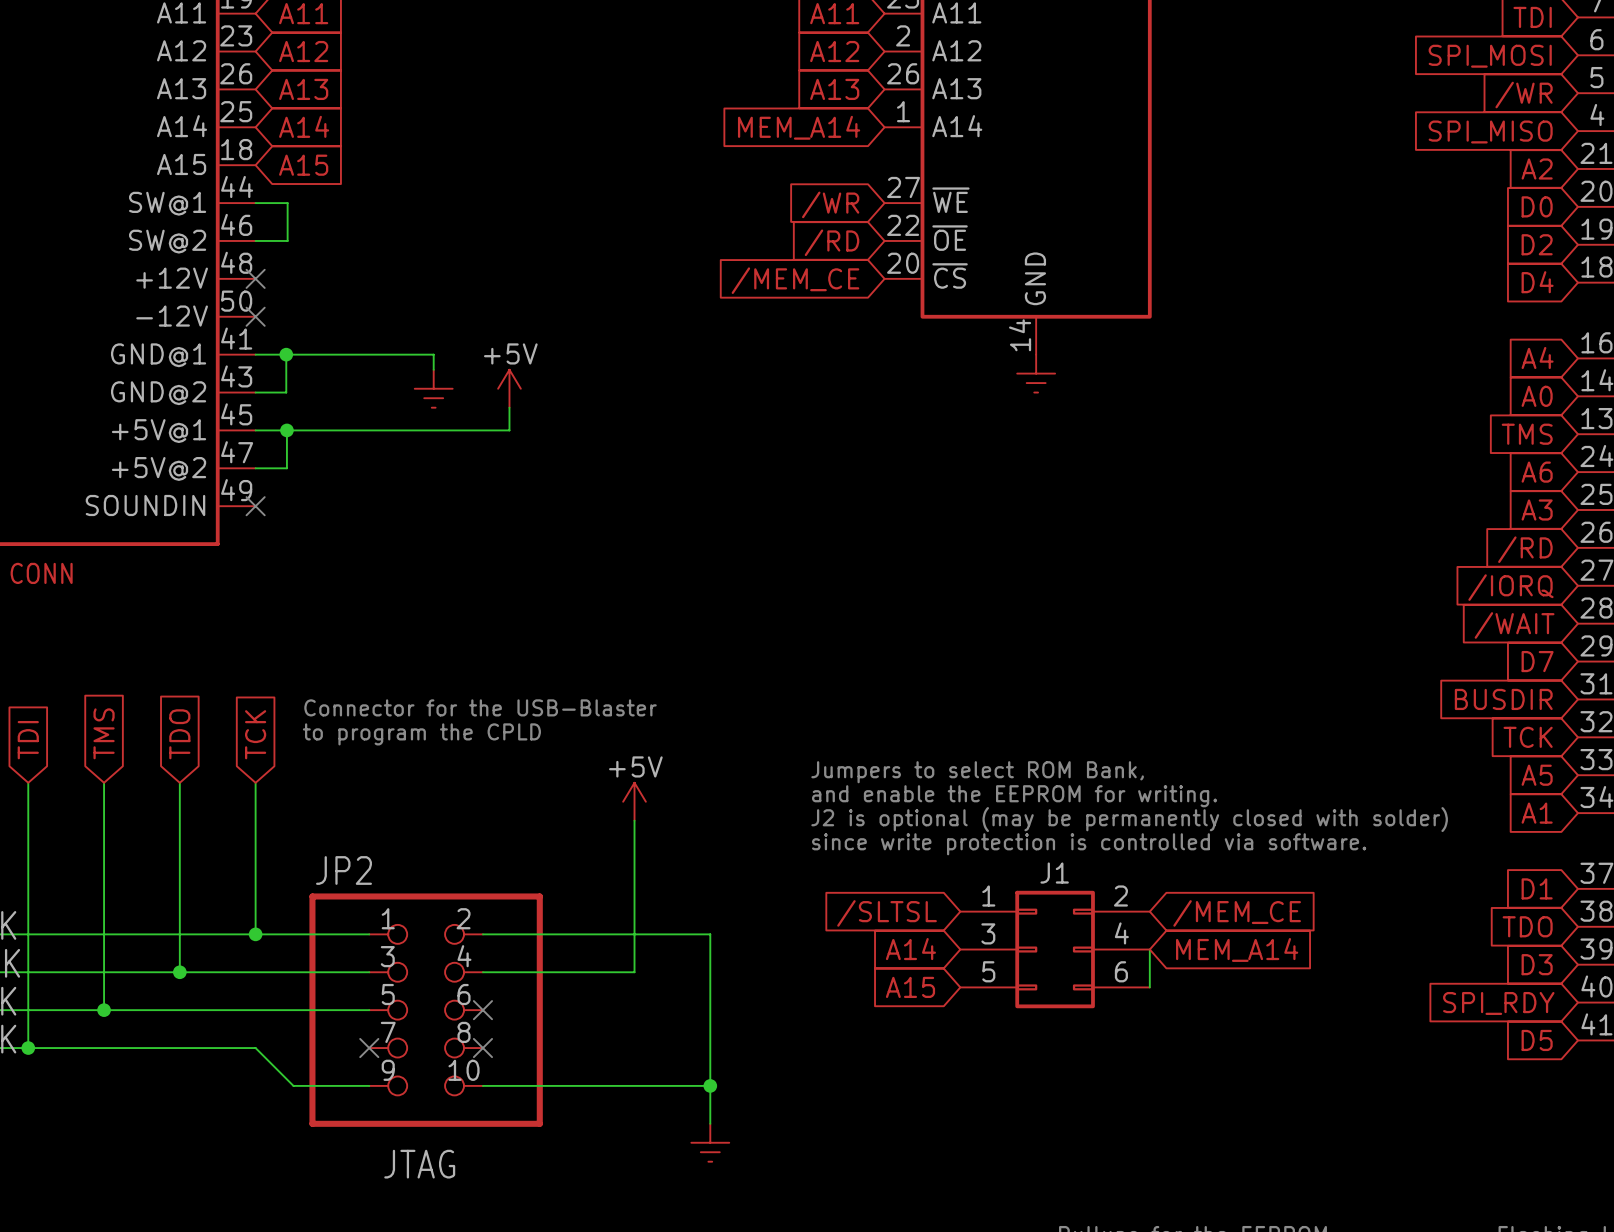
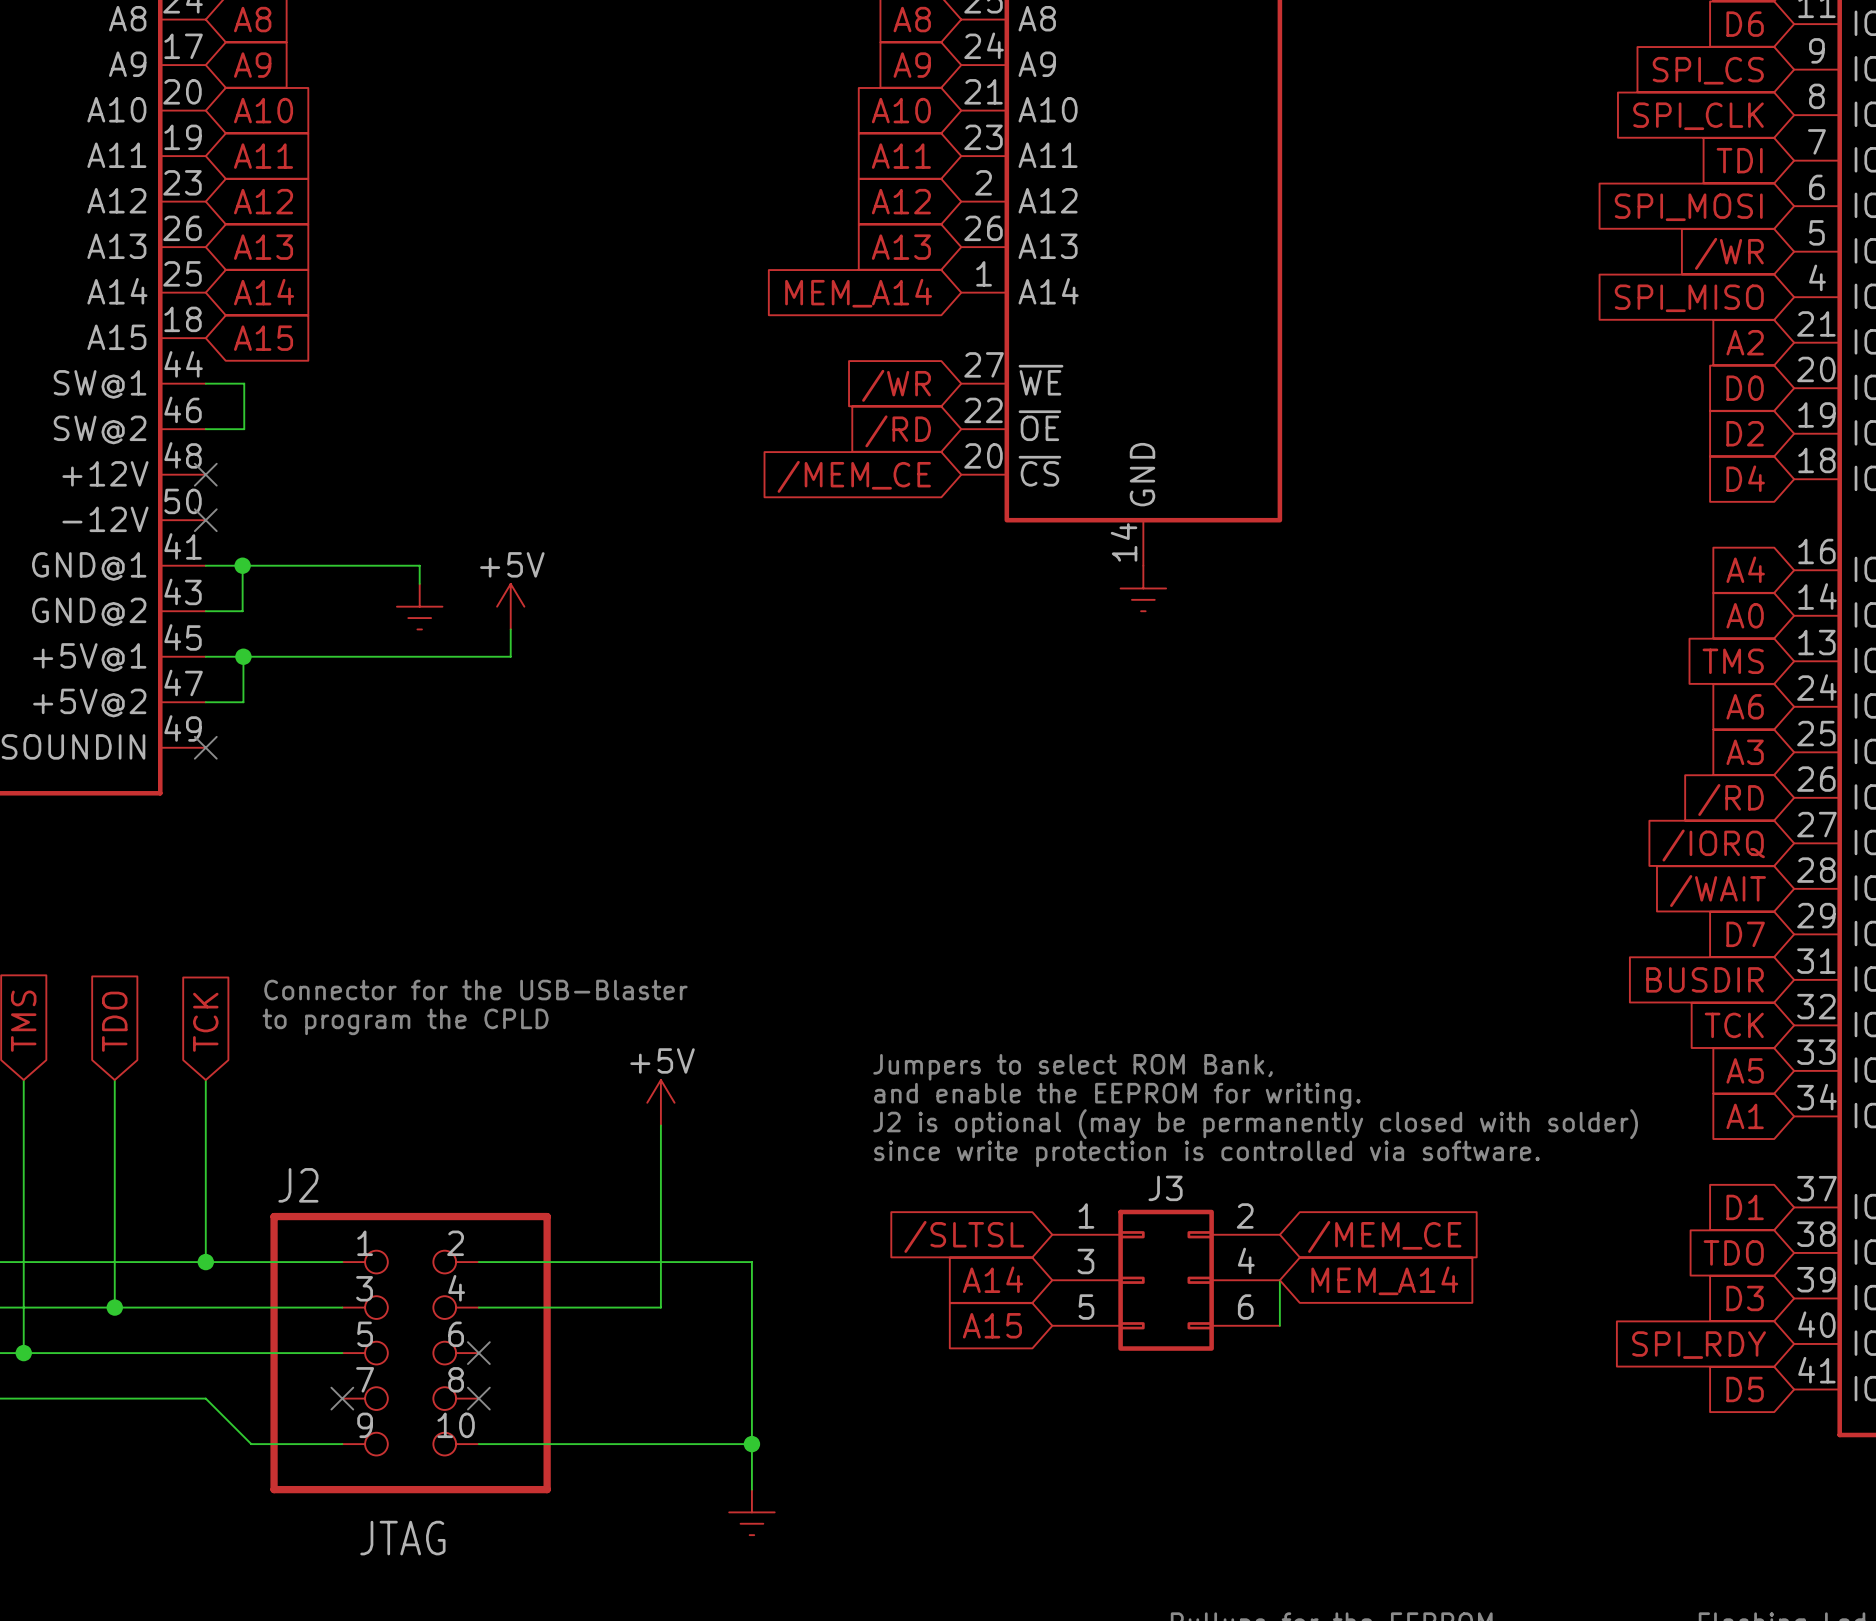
JP2 name: JP2 (344, 870) -> J2 (298, 1185)
J1 name: J1 (1054, 873) -> J3 (1165, 1188)

